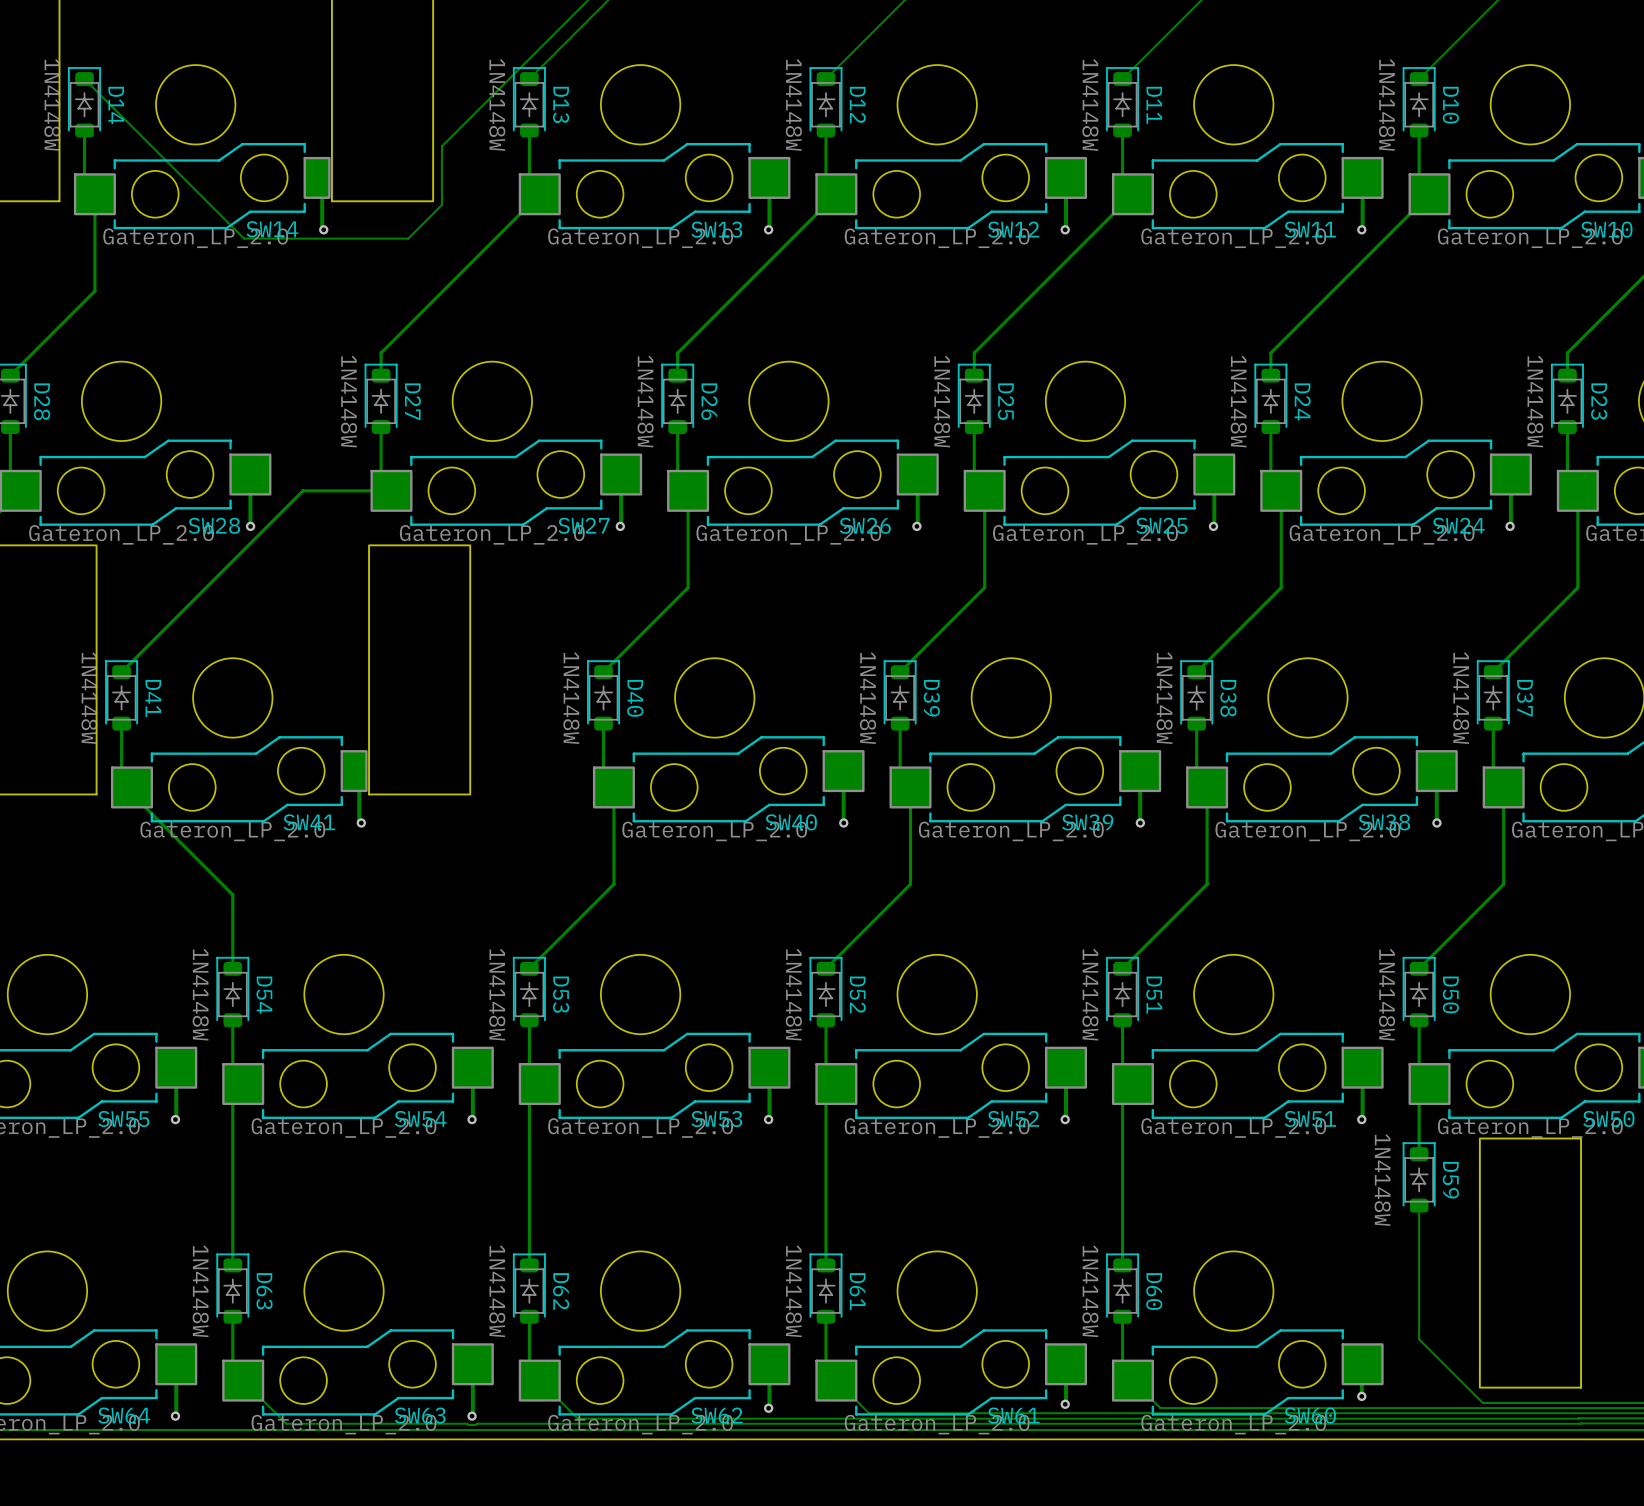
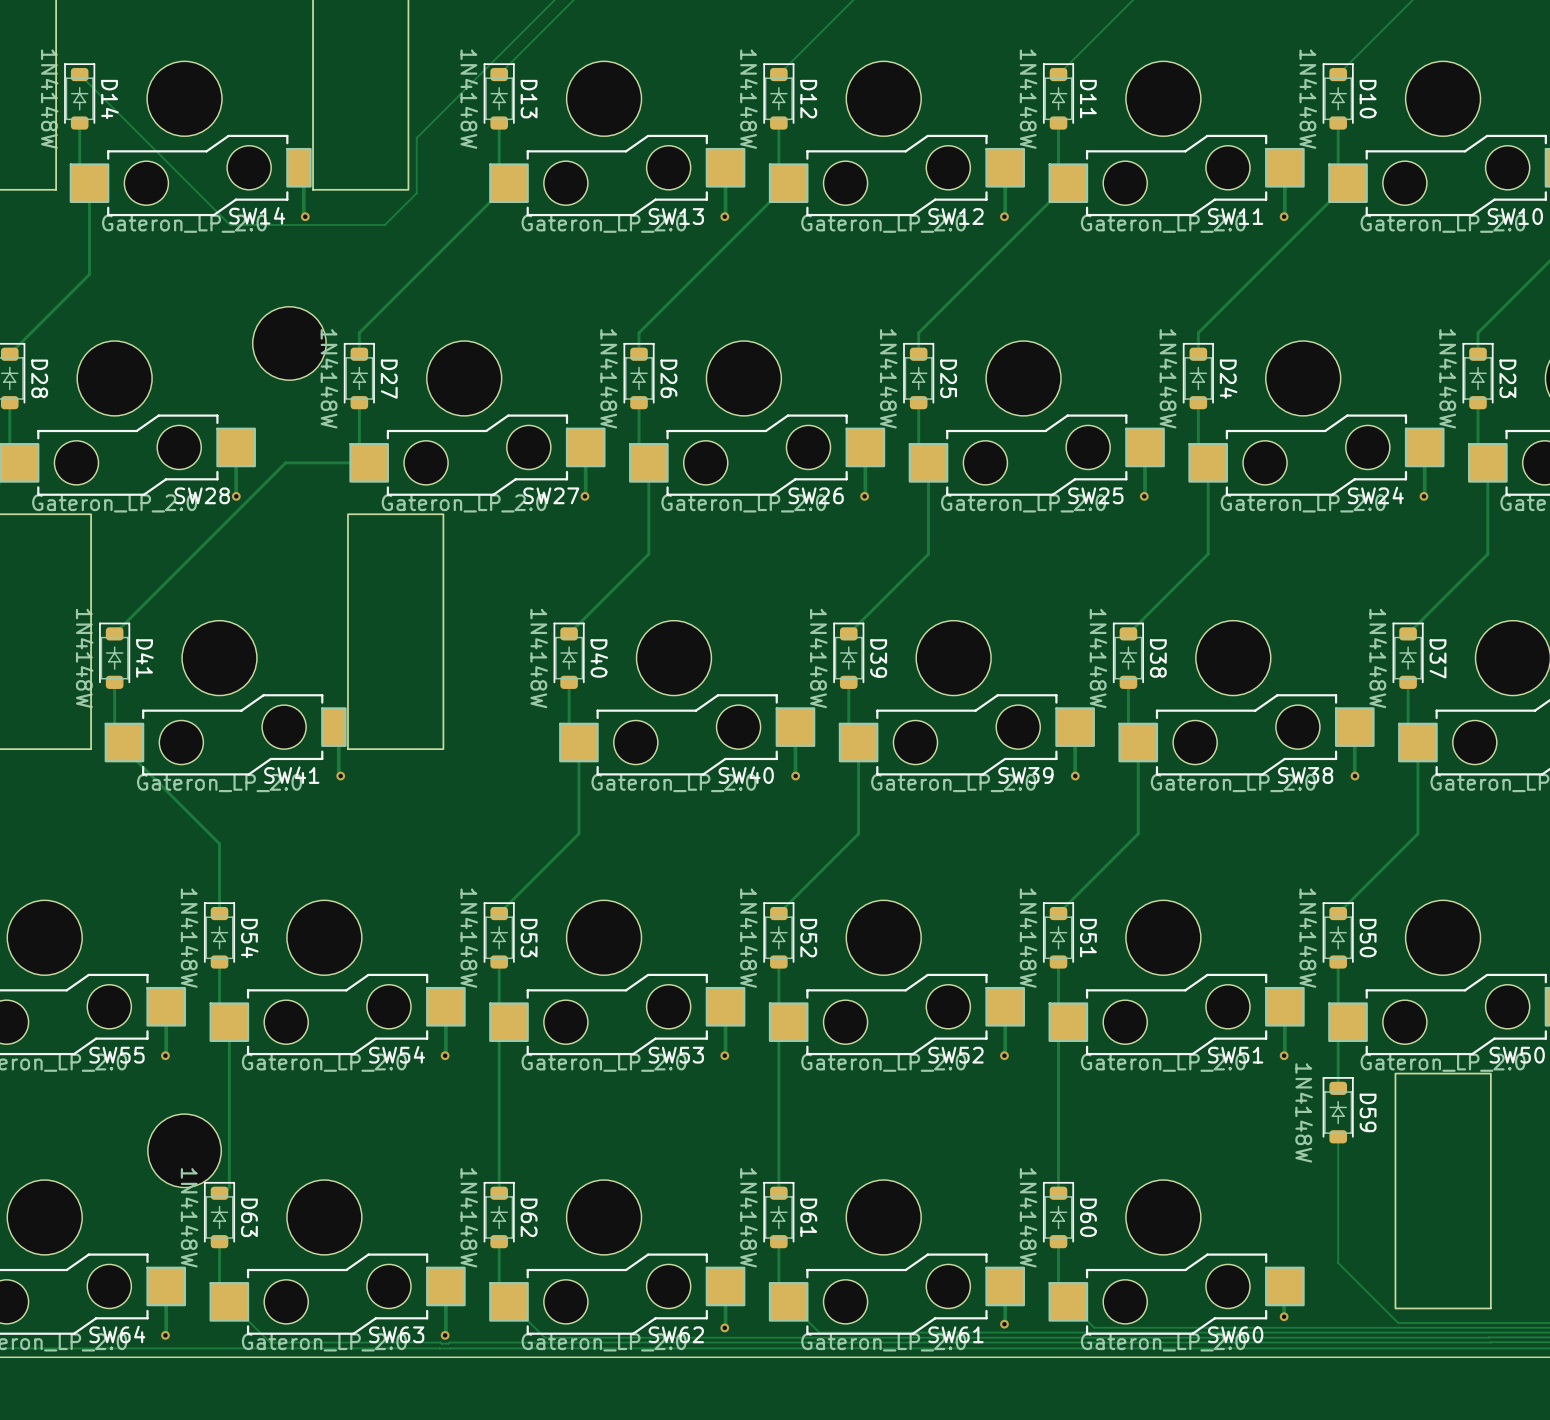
part: none -> (289, 343)
track: none -> (229, 1022) (229, 1187) (219, 1197)
track: (232, 1094) (232, 1265) -> none
part: none -> (184, 1150)

